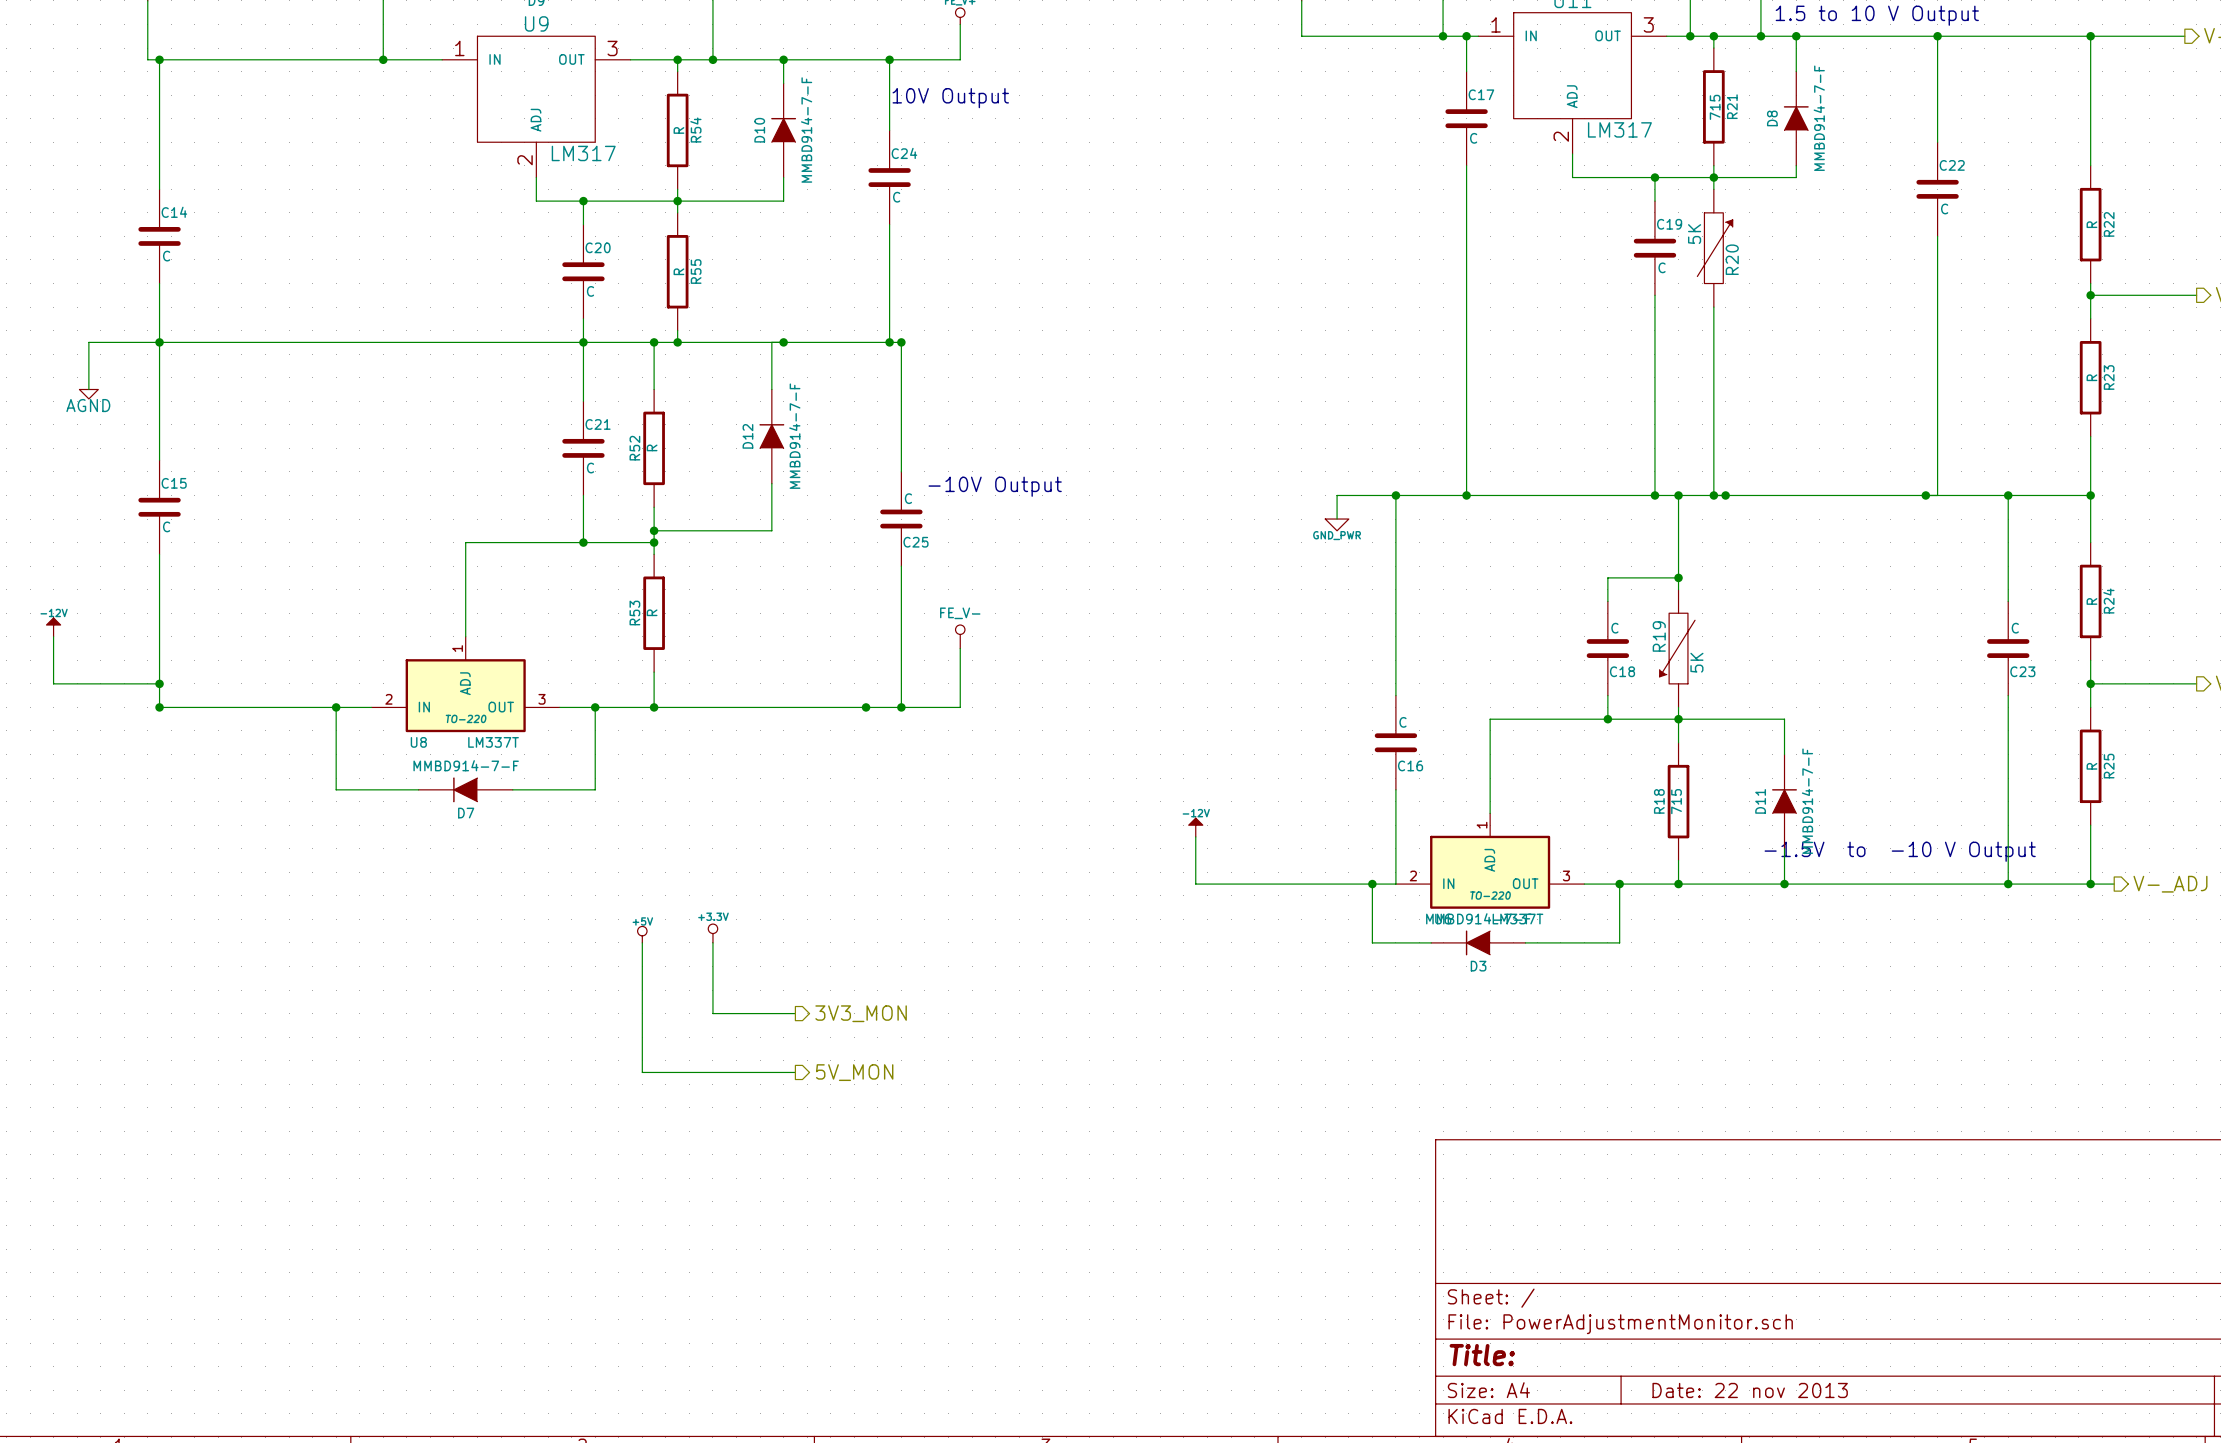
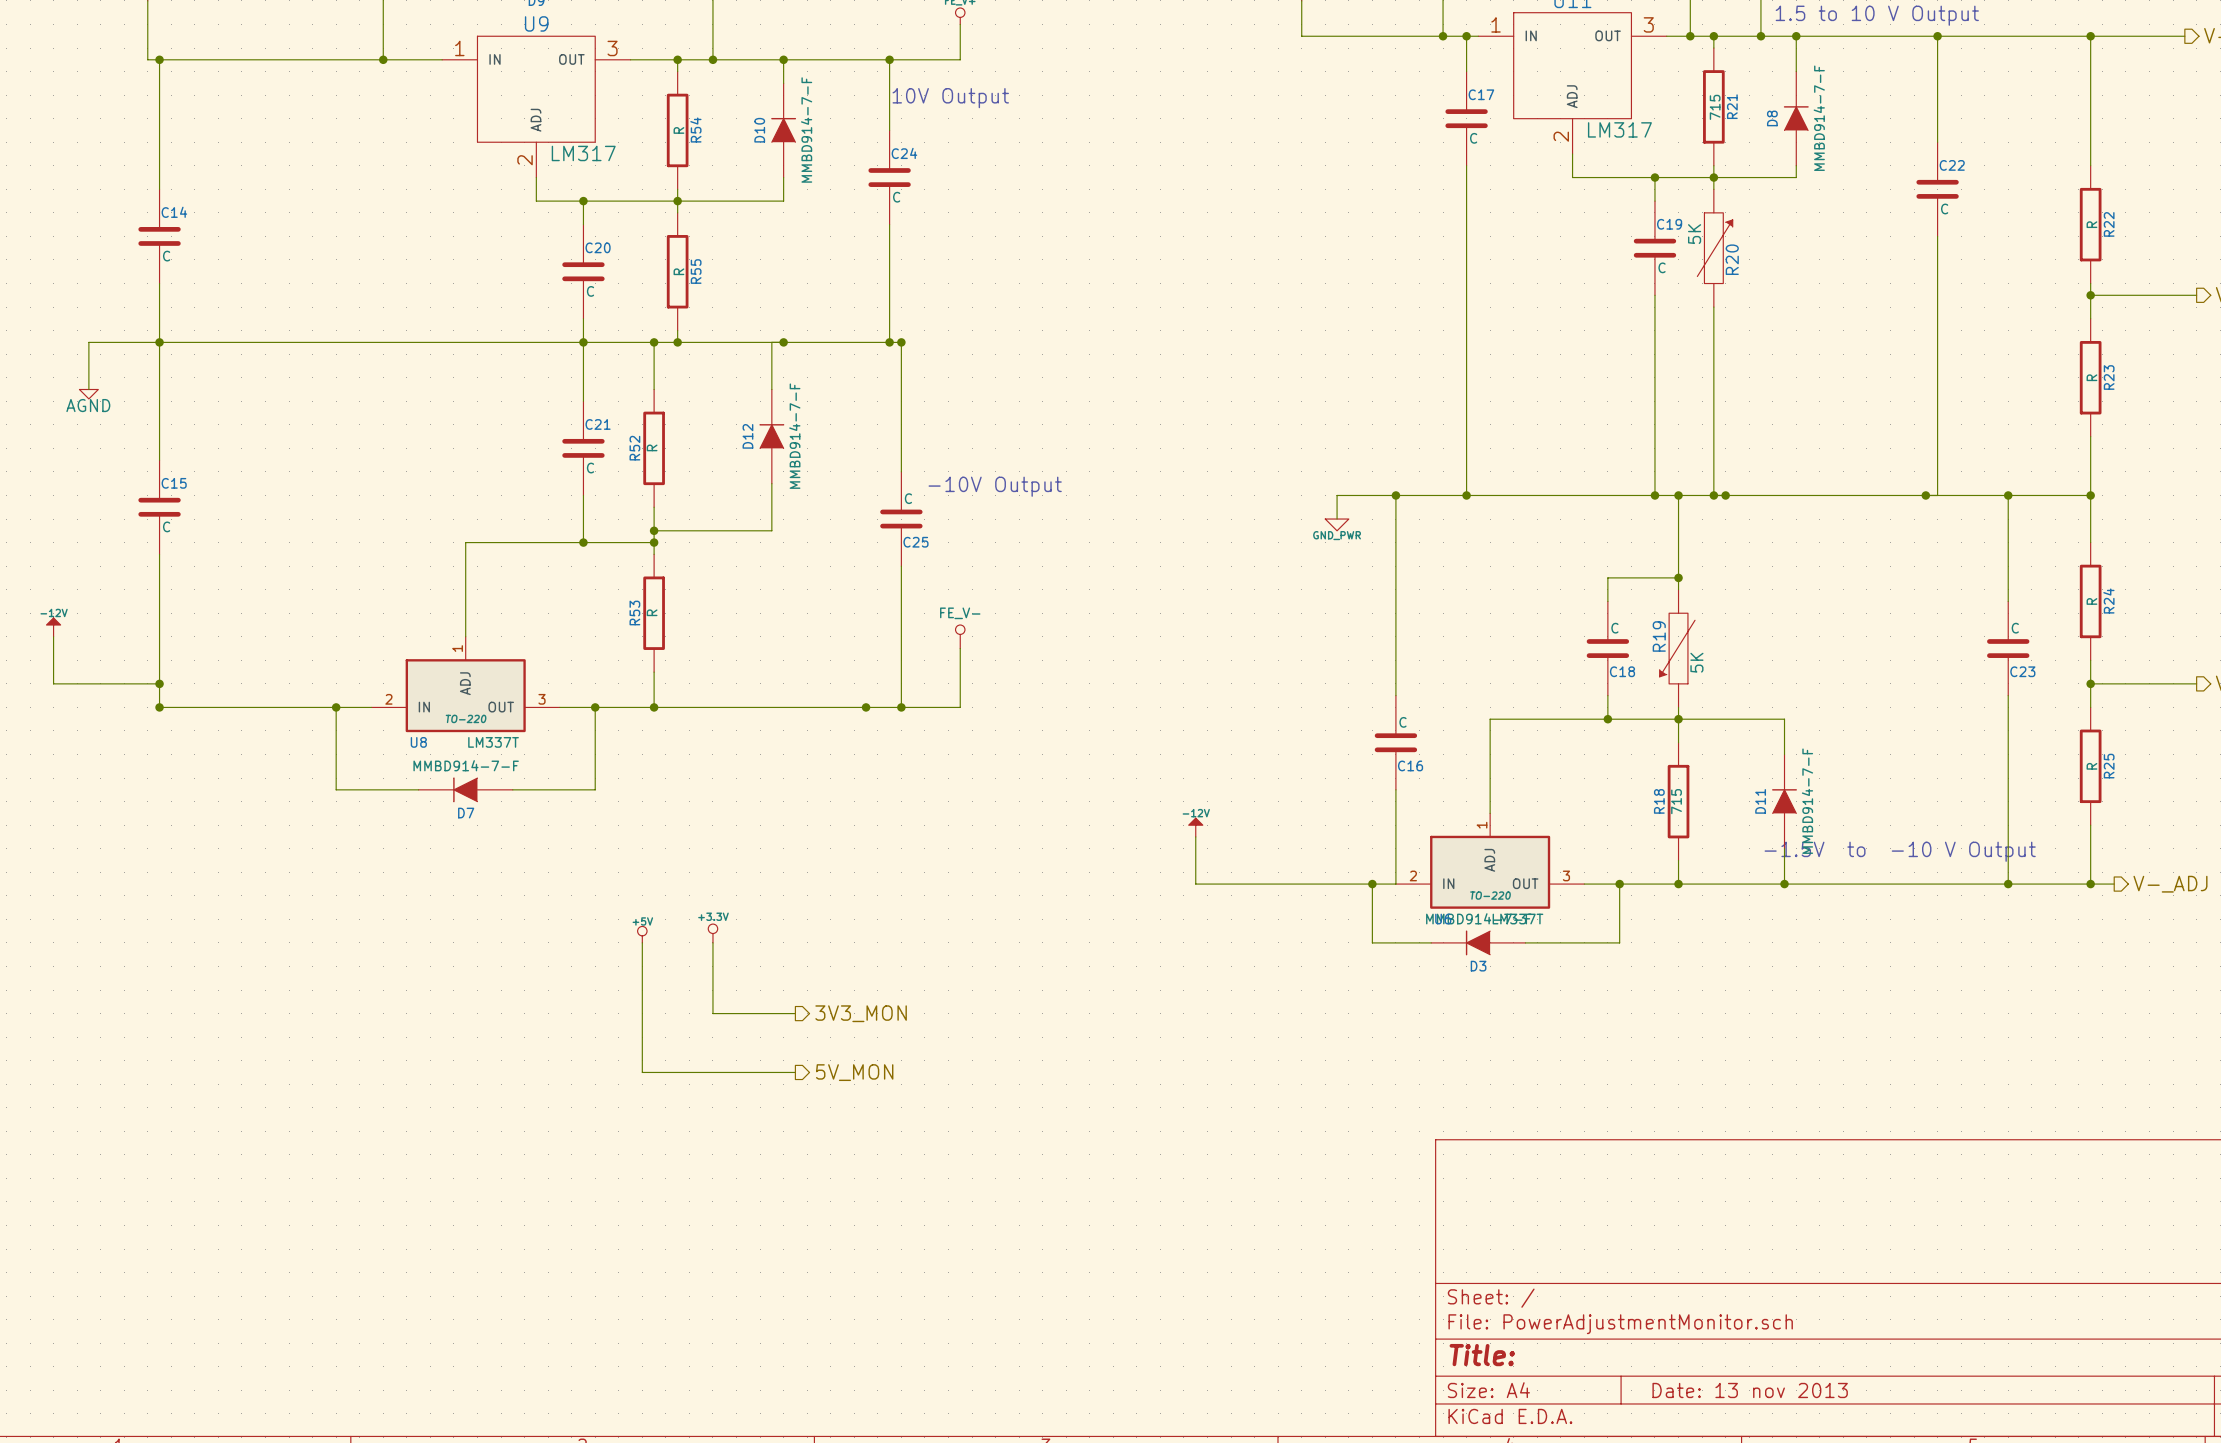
title block: Date: 22 nov 2013 (1750, 1390) -> Date: 13 nov 2013 (1750, 1390)

